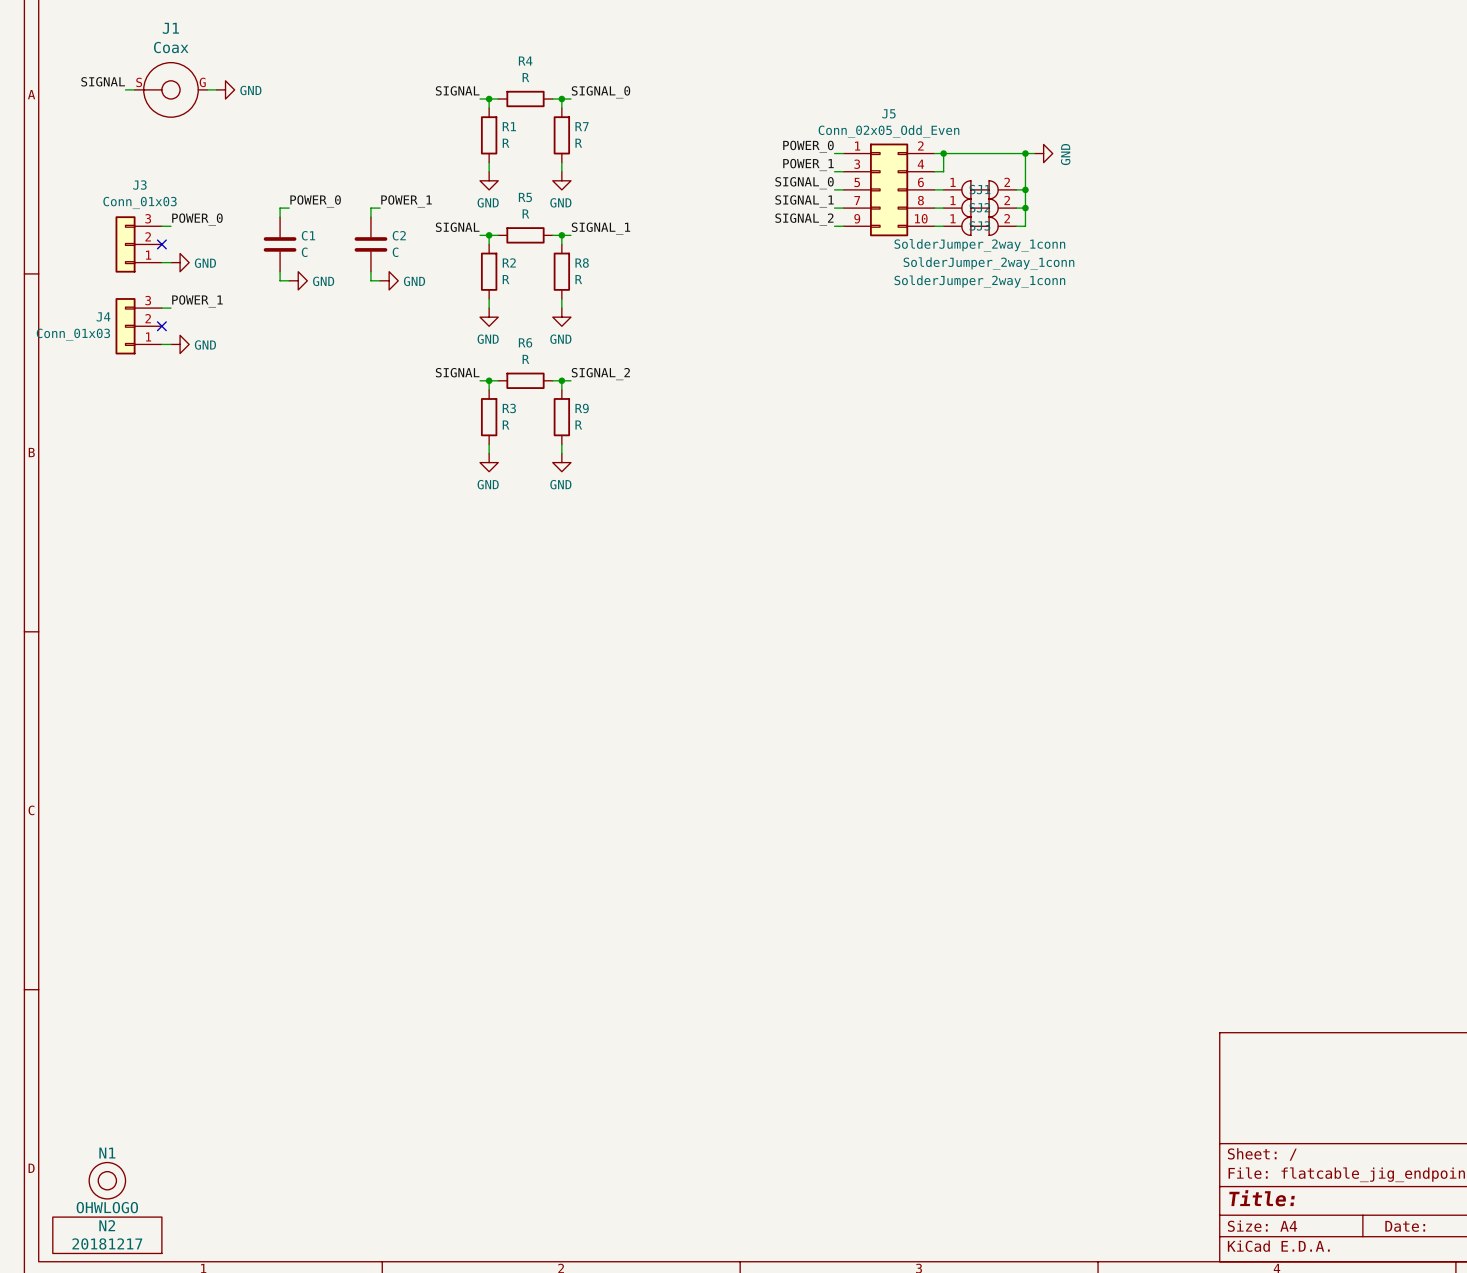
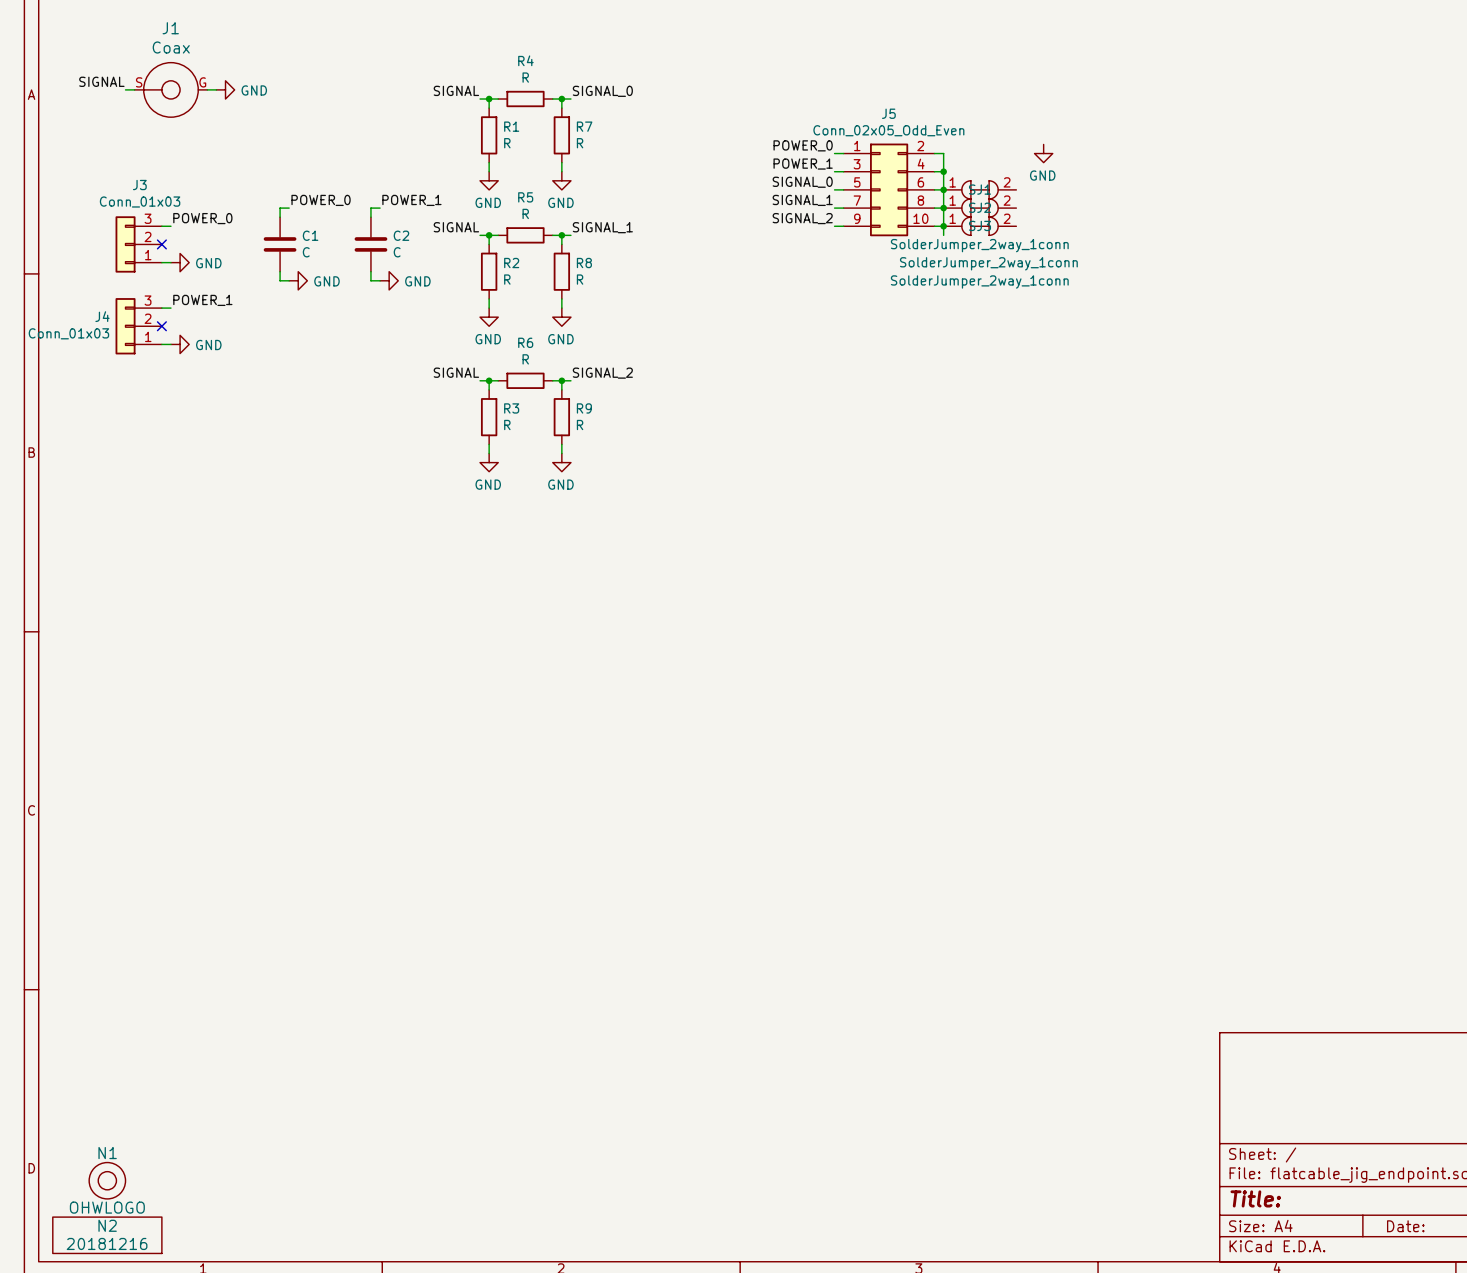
wire: (943, 153) (1034, 153) -> none
junction: (943, 153) -> none
wire: (1025, 153) (1025, 226) (1016, 226) -> none
junction: (1025, 153) -> none
power symbol rotation: 0° (1043, 153) -> 90° clockwise (1043, 153)
wire: none -> (943, 171) (943, 235)
junction: none -> (943, 171)
junction: none -> (943, 189)
wire: (1016, 189) (1025, 189) -> none
junction: (1025, 189) -> none
junction: none -> (943, 208)
wire: (1016, 208) (1025, 208) -> none
junction: (1025, 208) -> none
junction: none -> (943, 226)
N2 value: 20181217 (107, 1243) -> 20181216 (107, 1243)

